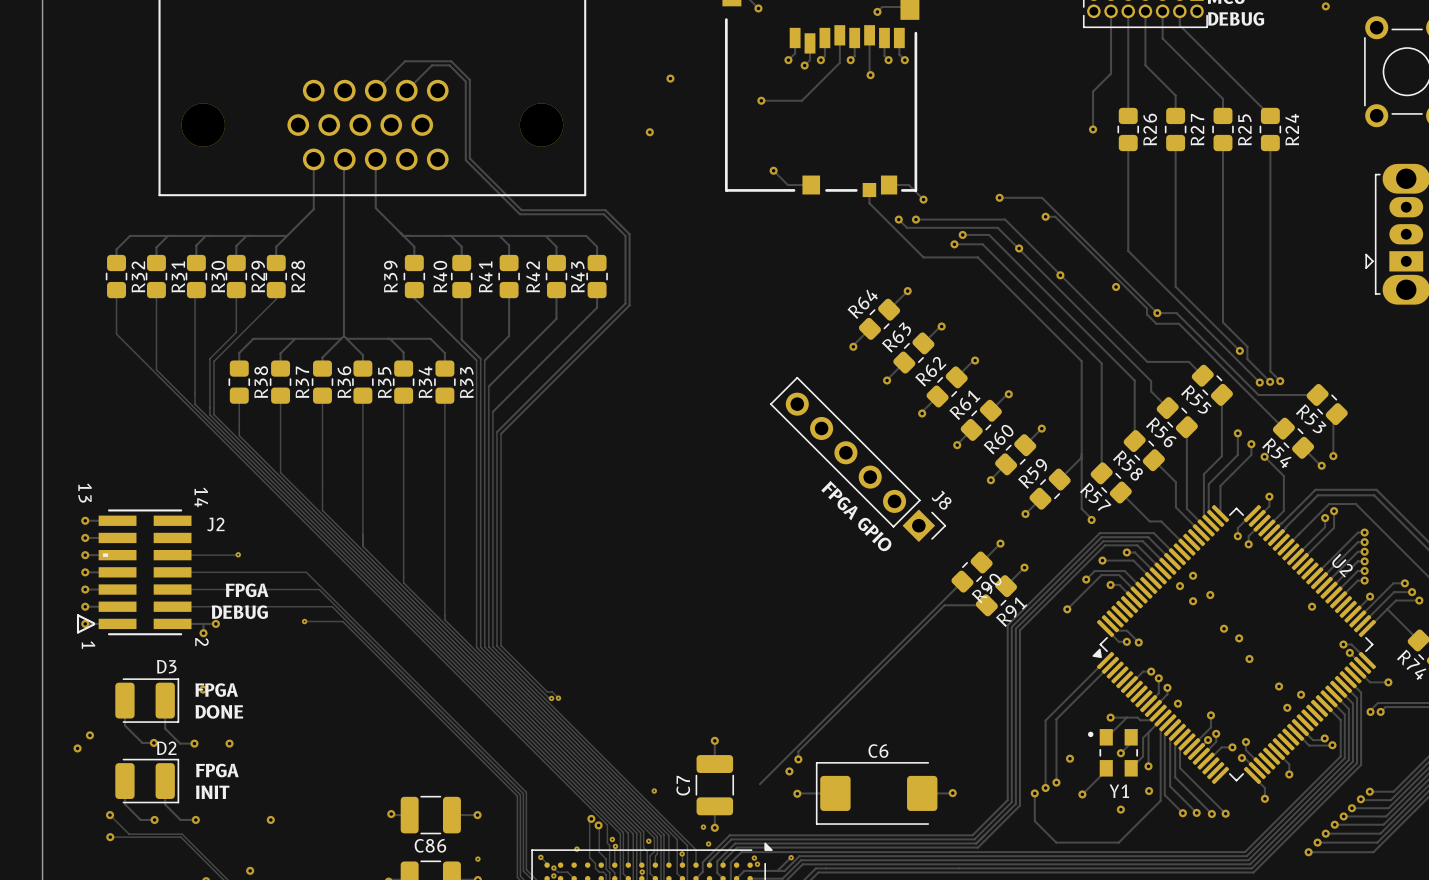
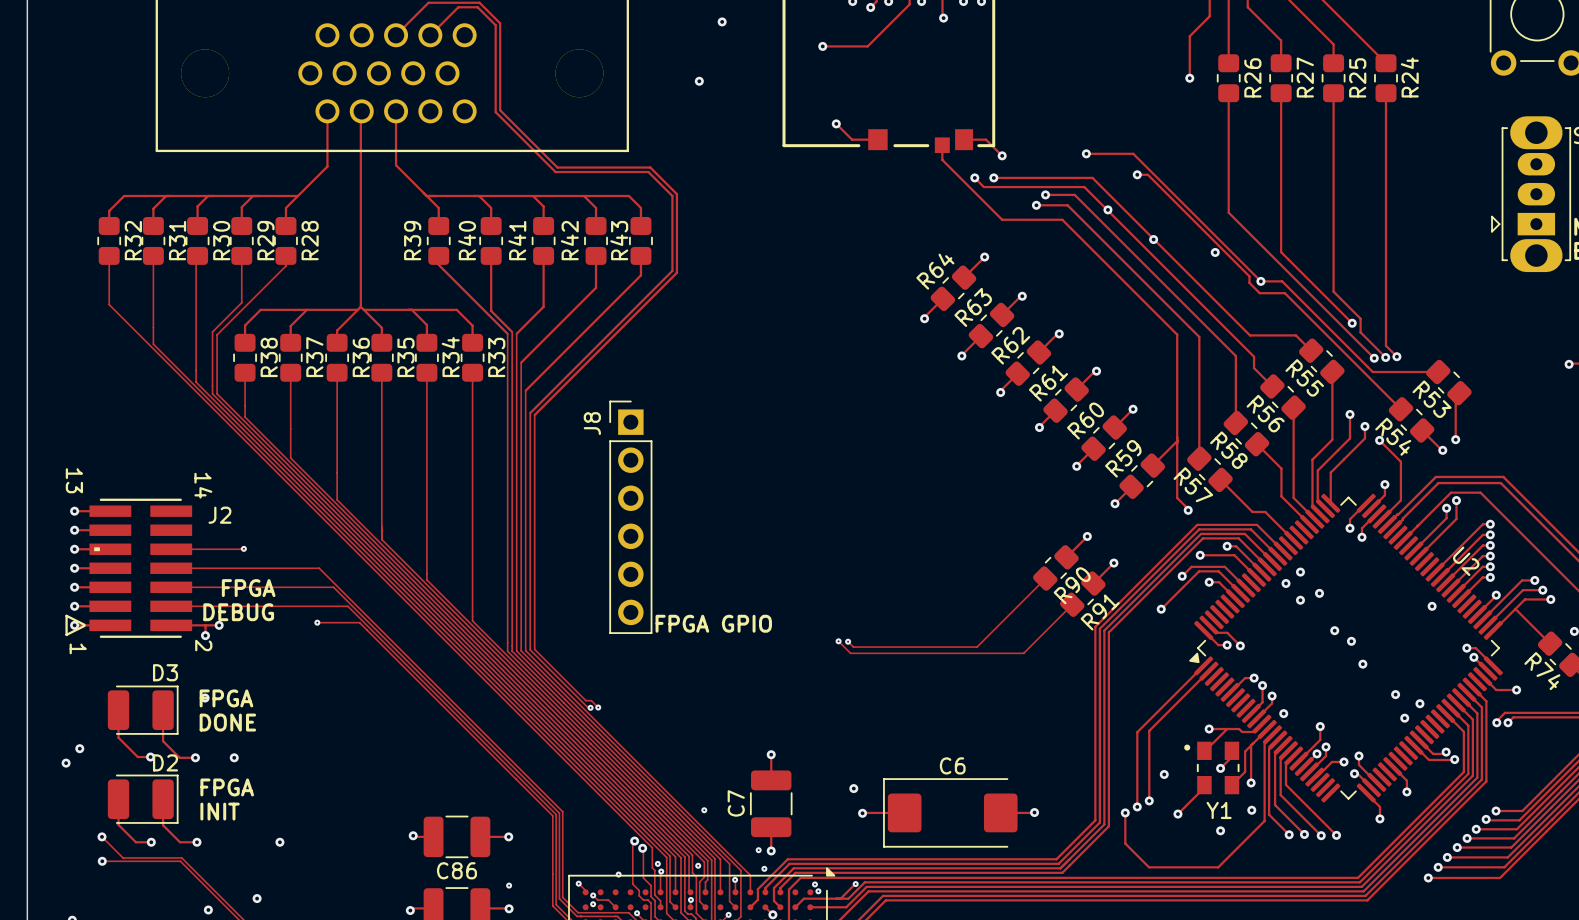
J8 rotation: 0° (858, 459) -> 135° counterclockwise (630, 517)
J8 position: (858, 459) -> (630, 517)
text rotation: 0° (856, 516) -> 45° counterclockwise (713, 623)
text position: FPGA GPIO (856, 516) -> FPGA GPIO (713, 623)
track: (962, 581) (759, 784) -> (1045, 578) (977, 647) (853, 647) (848, 641)
track: (986, 605) (944, 605) (798, 751) (798, 759) -> (1072, 604) (1023, 653) (850, 653) (838, 641)
via: none -> (838, 641)
via: none -> (848, 641)
via: (798, 759) -> none

